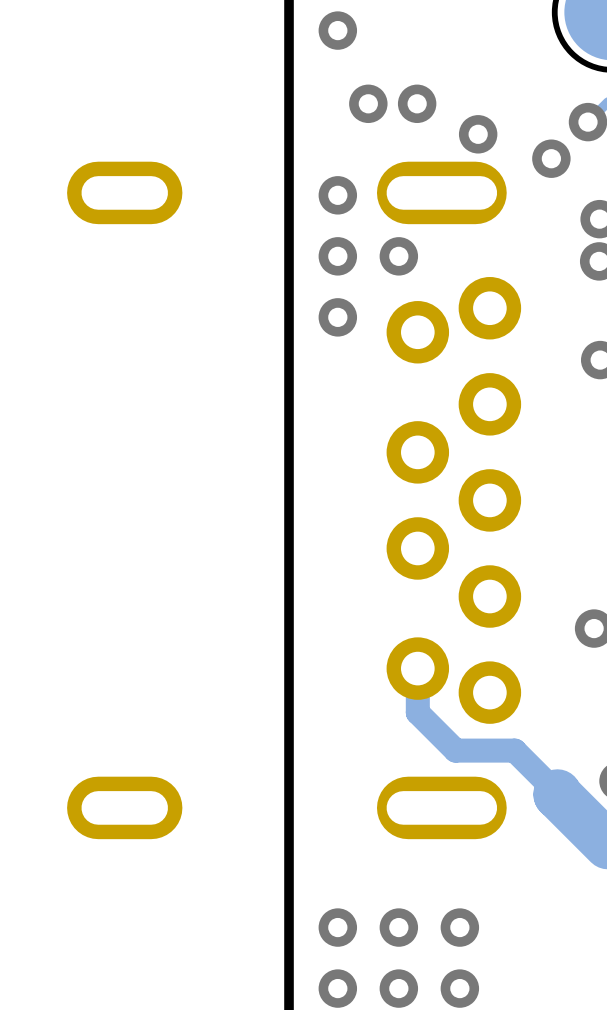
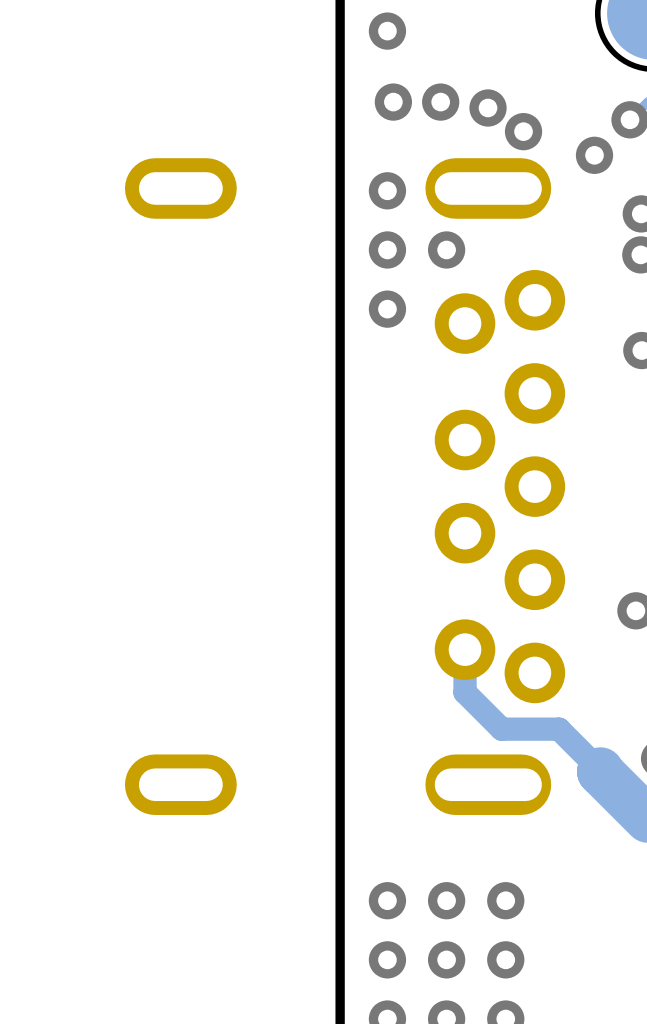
via: none -> (393, 102)
via: (368, 103) -> none
via: none -> (440, 102)
via: (417, 103) -> none
via: none -> (488, 107)

